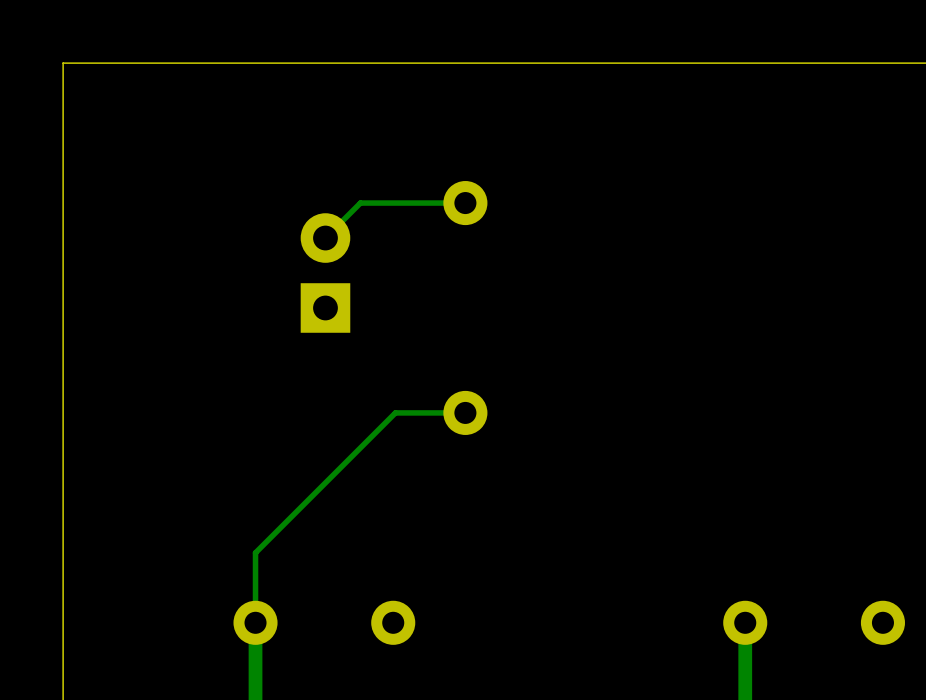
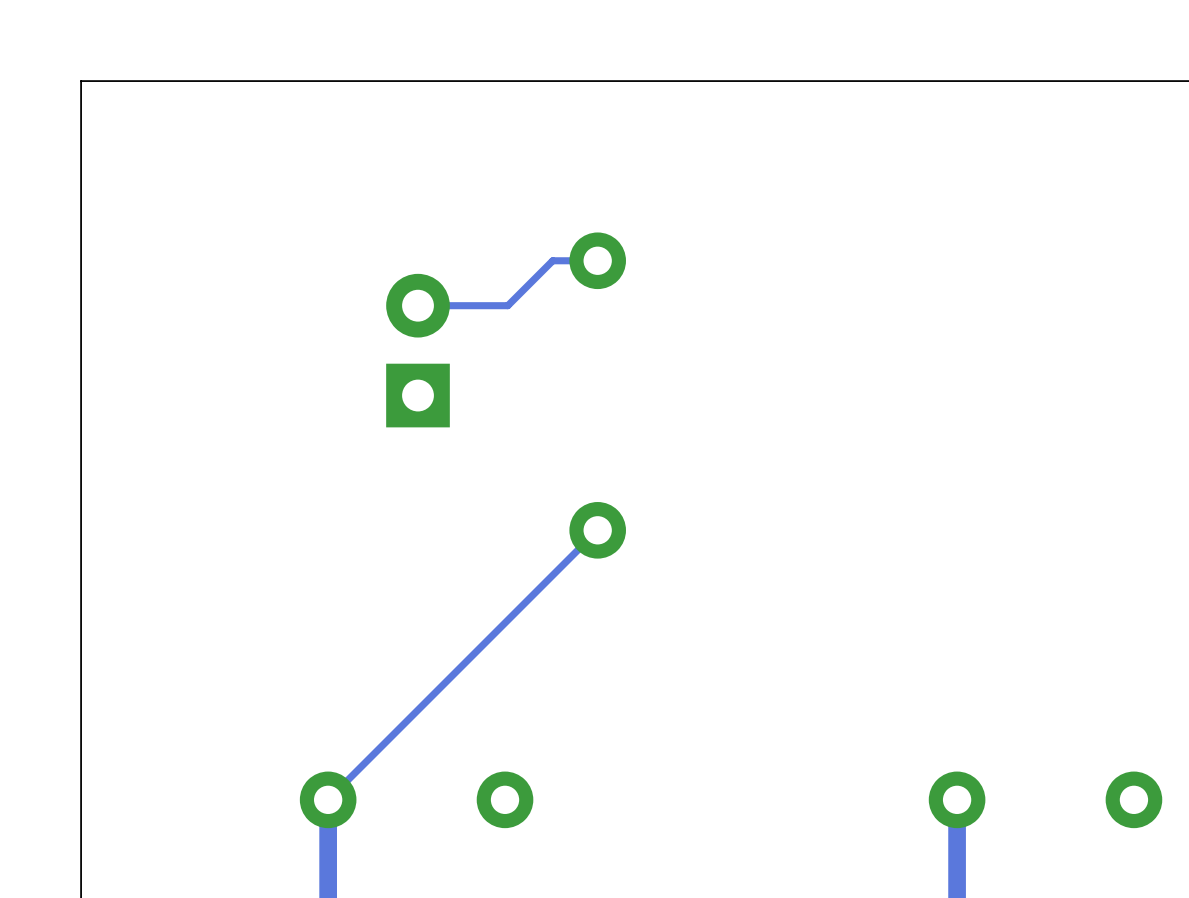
track: (430, 203) (360, 203) (325, 238) -> (552, 260) (507, 305) (418, 305)
track: (465, 412) (395, 412) (255, 552) (255, 622) -> (597, 530) (328, 799)

